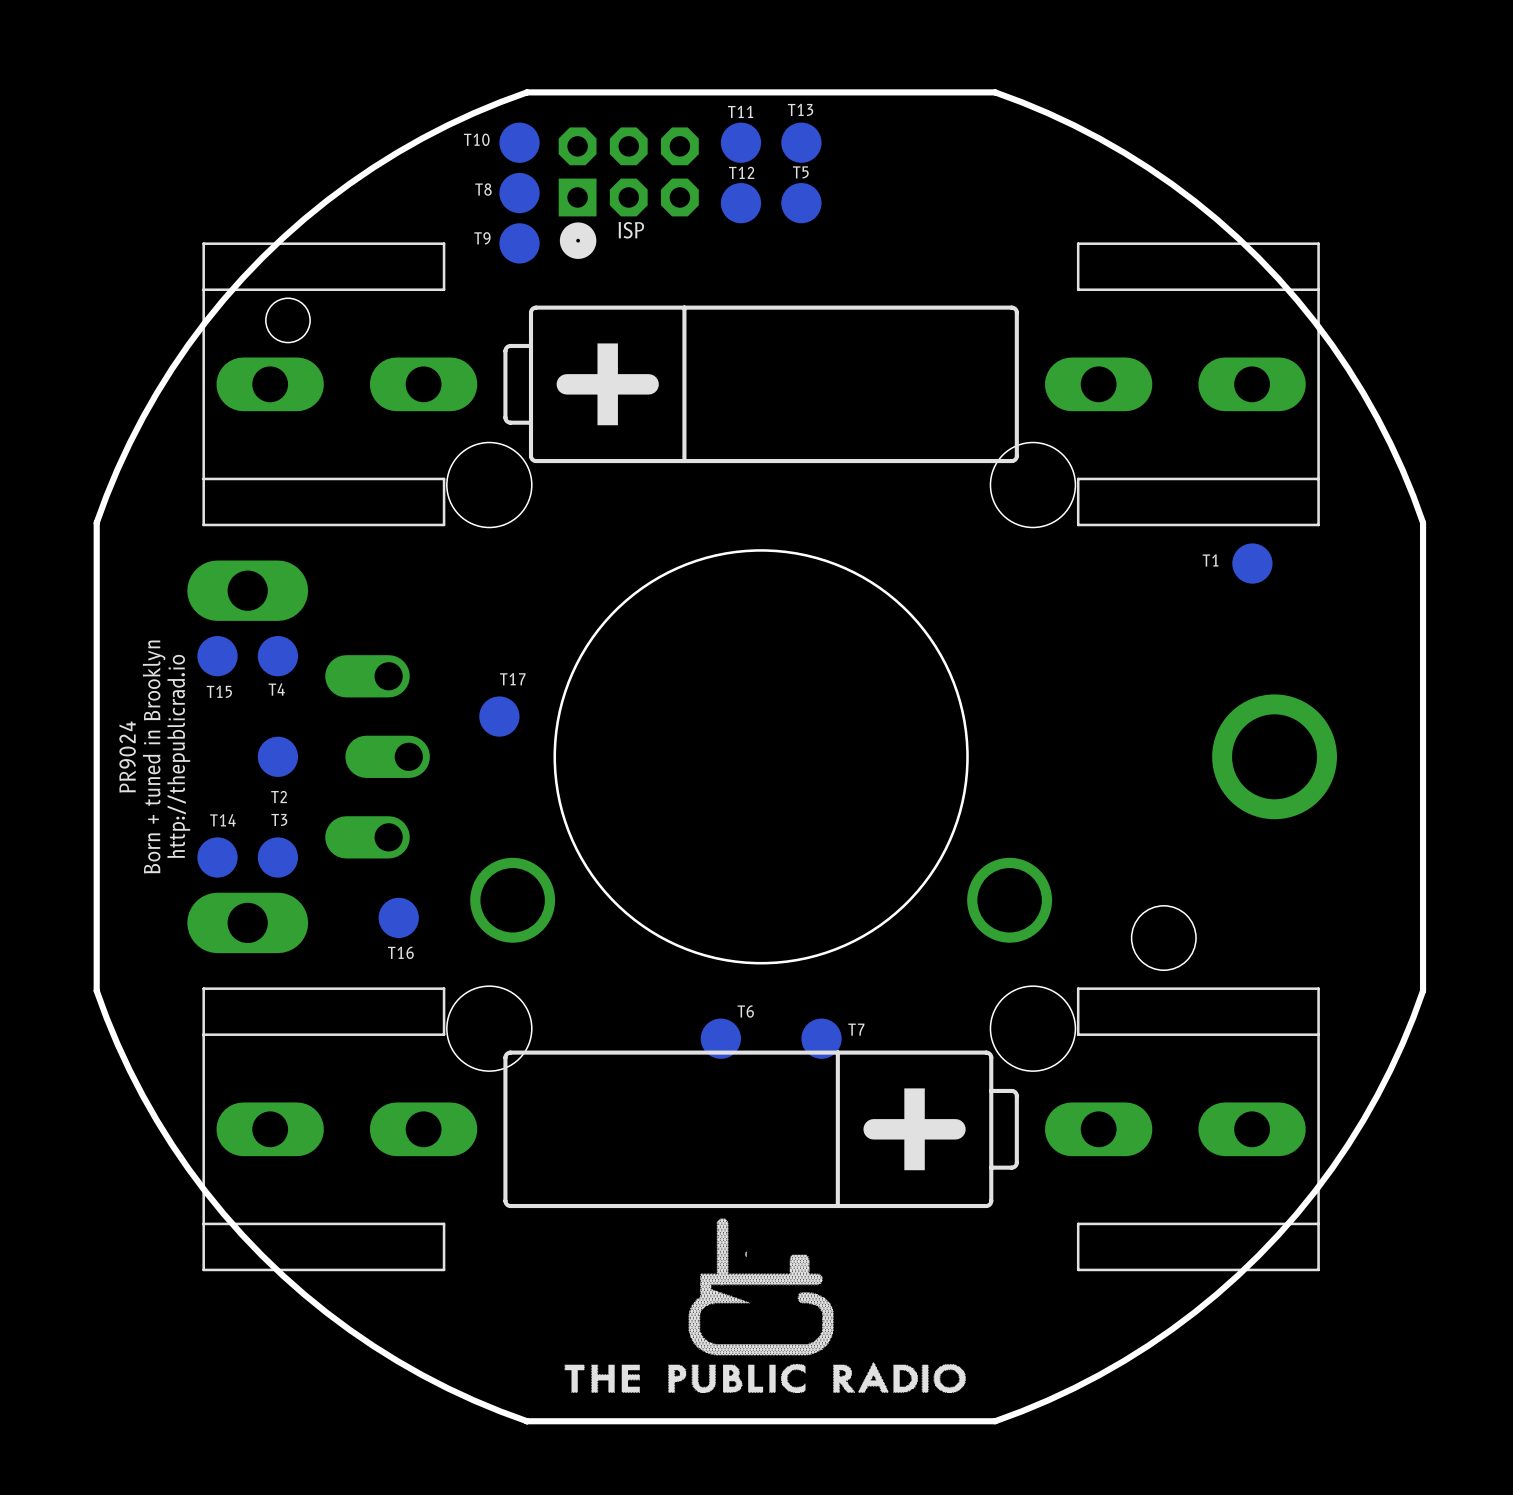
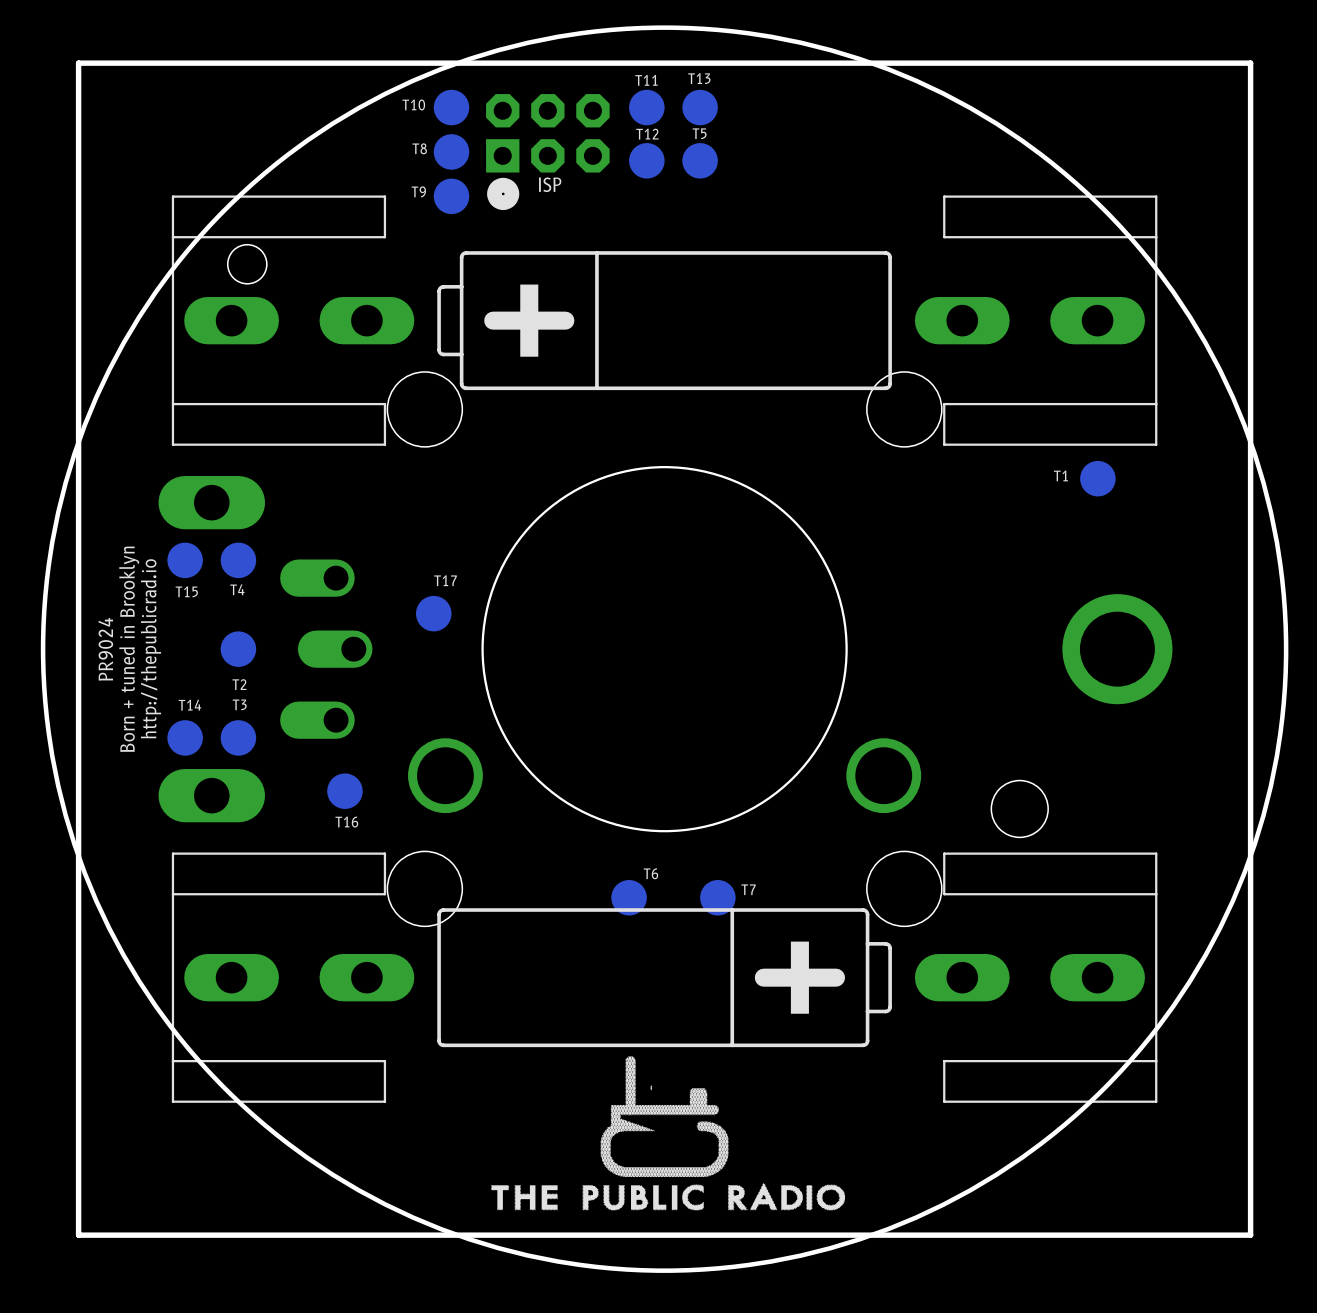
round board edge: none -> [40, 25, 1289, 1273]
board edge: (527, 92) (473, 113) (397, 152) (326, 201) (262, 257) (205, 322) (156, 393) (117, 469) (96, 522) -> (458, 63) (78, 63) (78, 442)
board edge: (995, 92) (1048, 113) (1124, 152) (1194, 201) (1258, 258) (1315, 322) (1348, 369) (1390, 443) (1423, 522) (1423, 990) (1390, 1070) (1348, 1144) (1315, 1191) (1278, 1234) (1216, 1294) (1171, 1329) (1124, 1360) (1048, 1400) (995, 1421) -> (871, 63) (1250, 63) (1250, 1235) (871, 1235)
board edge: (96, 990) (117, 1044) (156, 1120) (205, 1191) (262, 1255) (326, 1312) (397, 1361) (473, 1400) (527, 1421) -> (78, 855) (78, 1235) (457, 1235)

